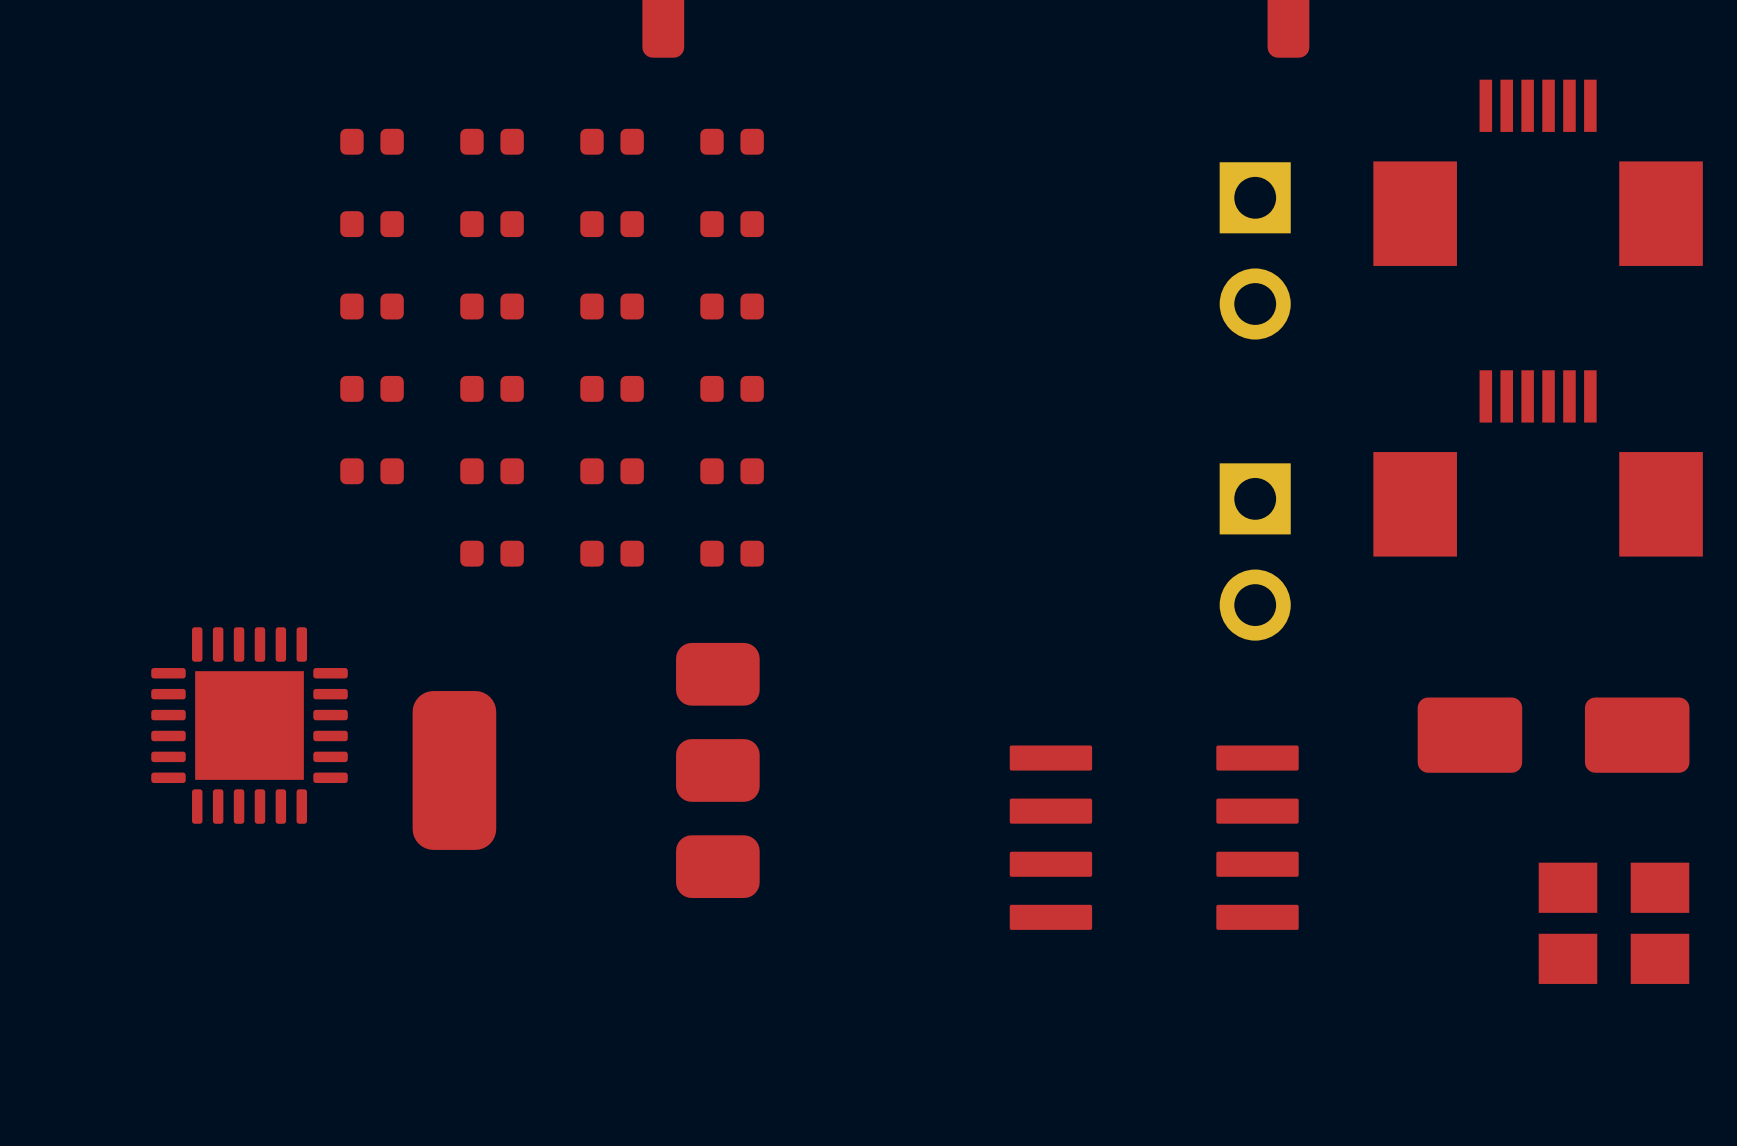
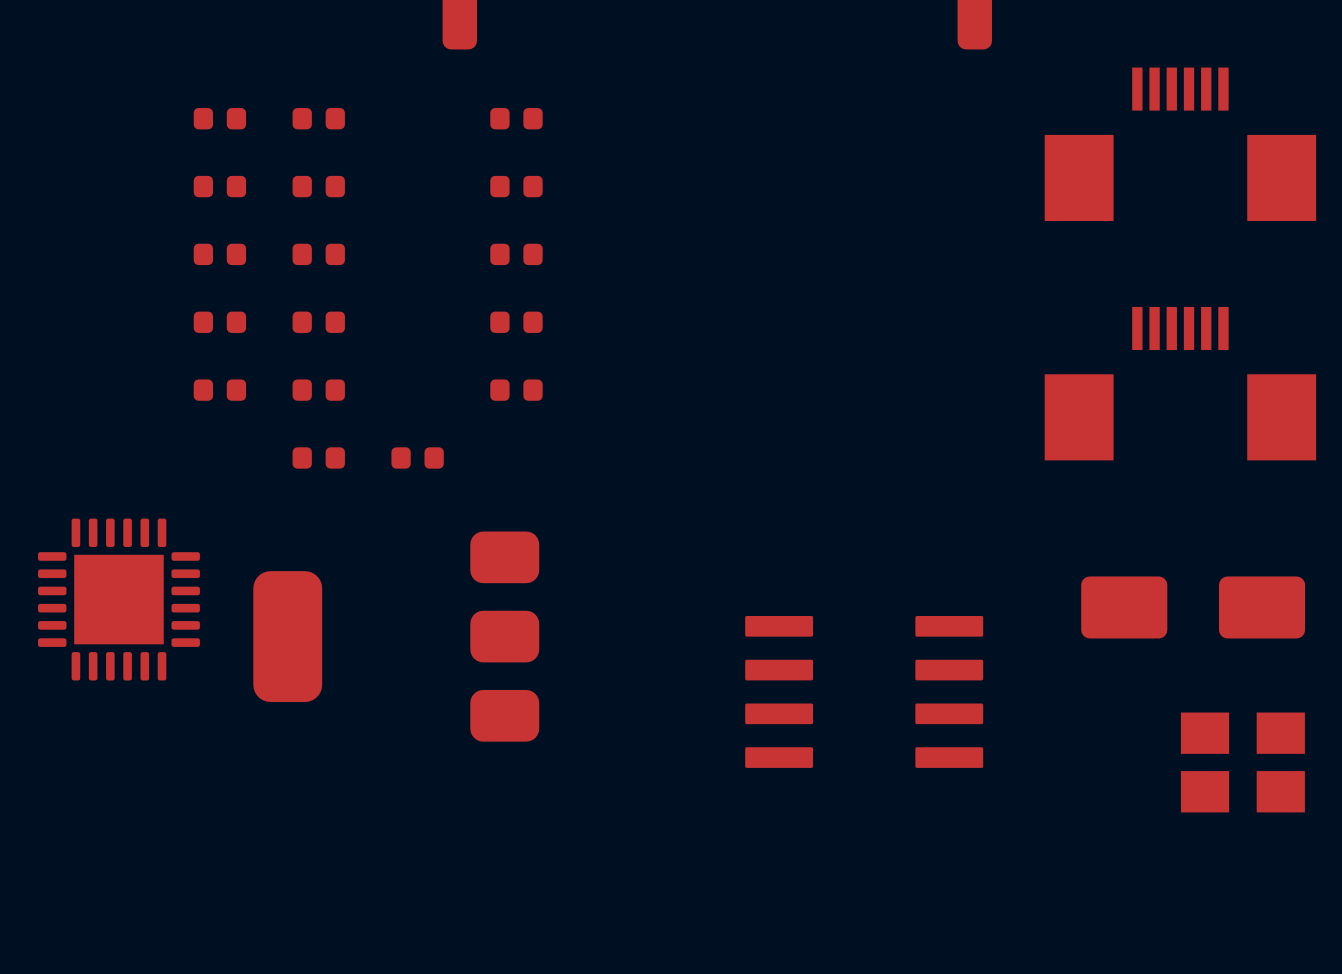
part: (612, 141) -> none
part: (612, 224) -> none
part: (1255, 250) -> none
part: (612, 306) -> none
part: (612, 388) -> none
part: (612, 471) -> none
part: (1255, 551) -> none
part: (732, 553) -> none

